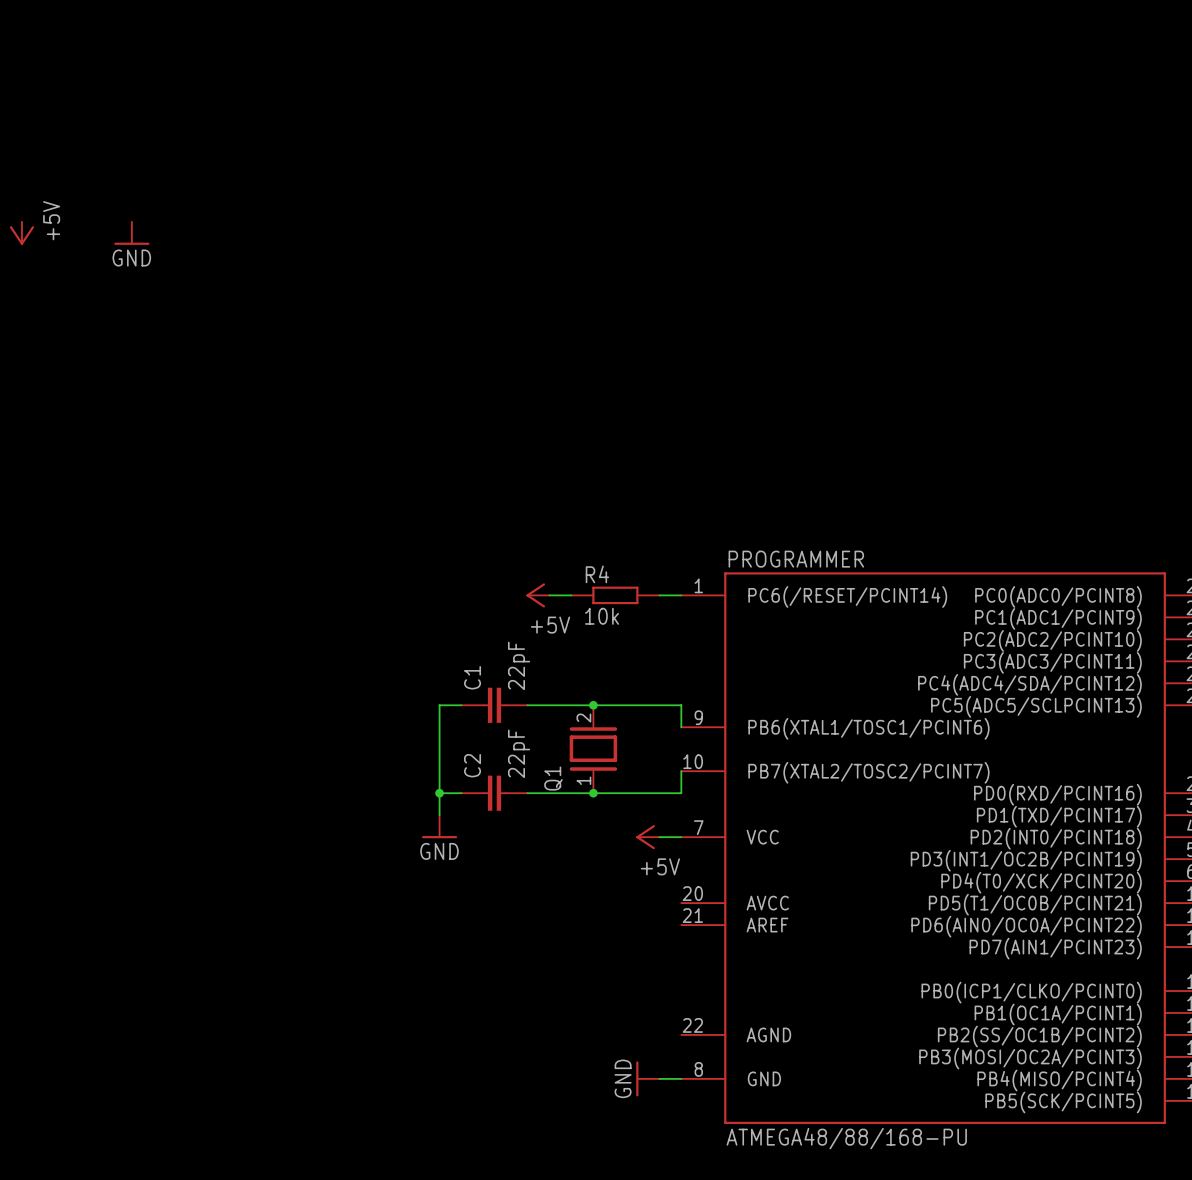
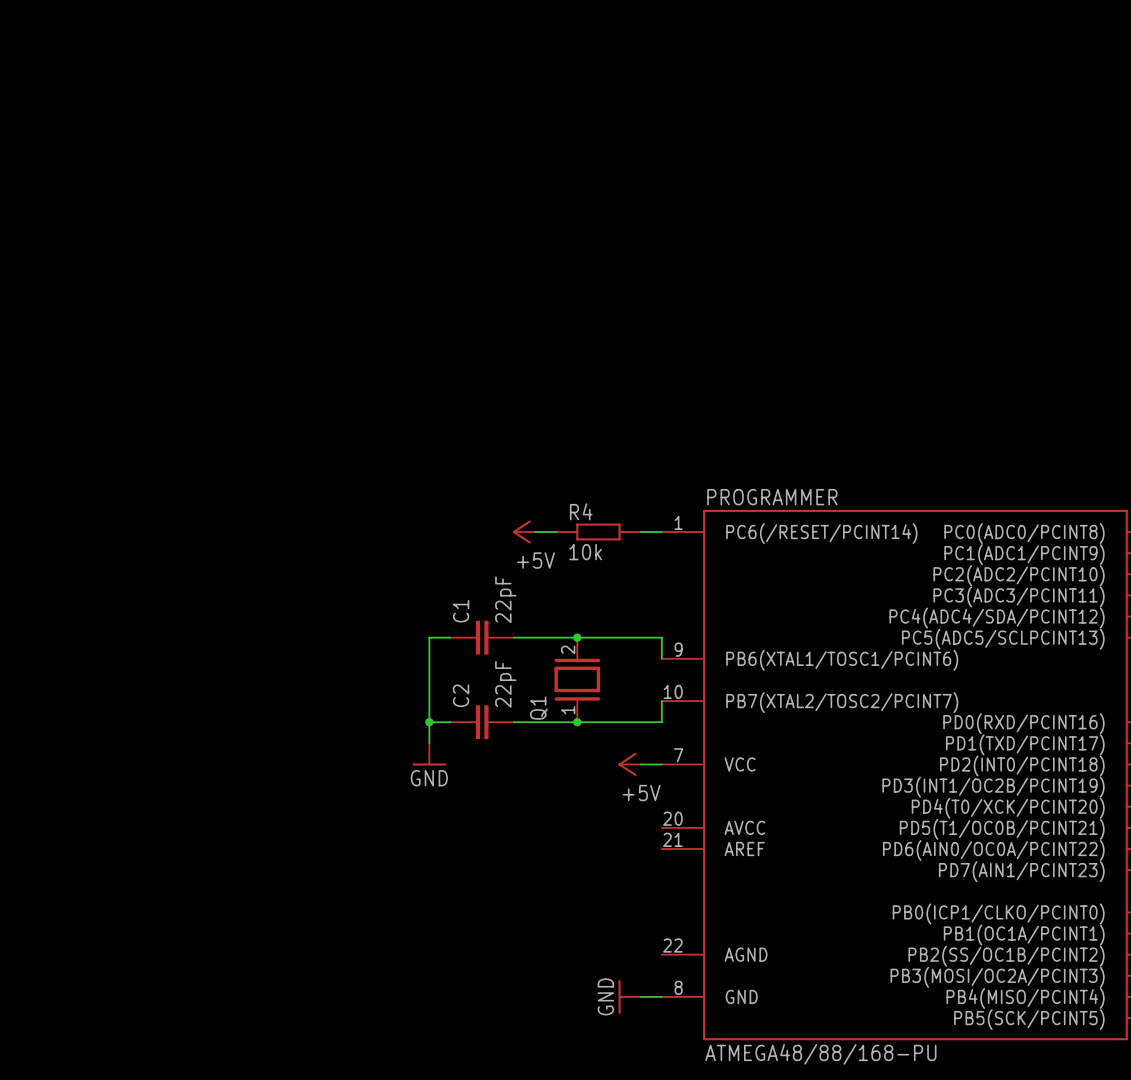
power symbol: +5V (21, 233) -> none
power symbol: GND (131, 233) -> none

